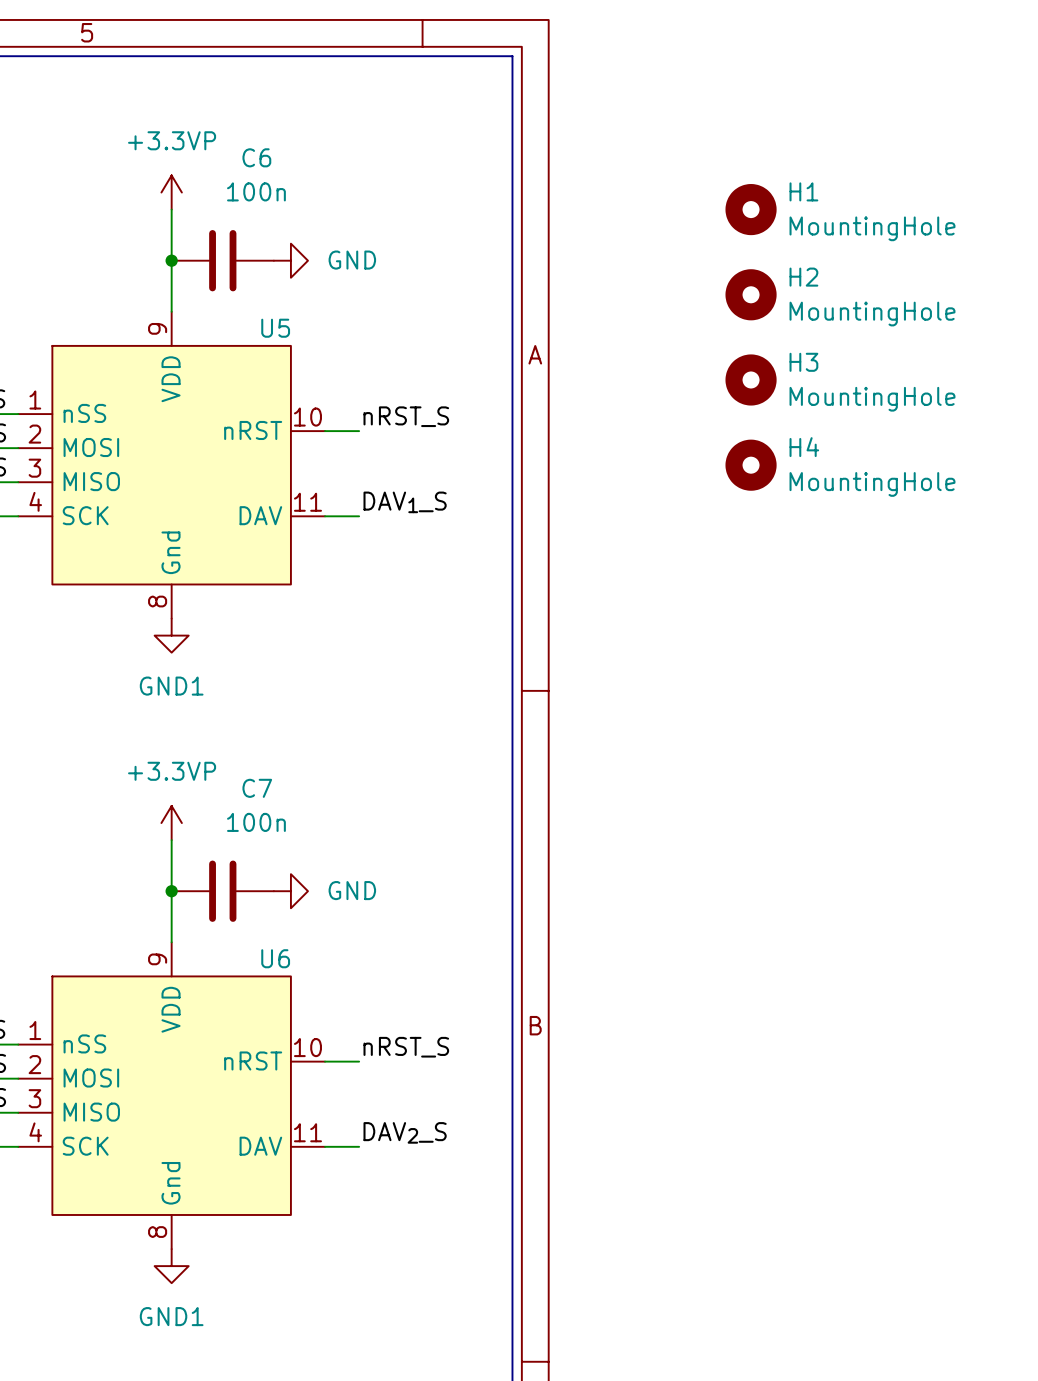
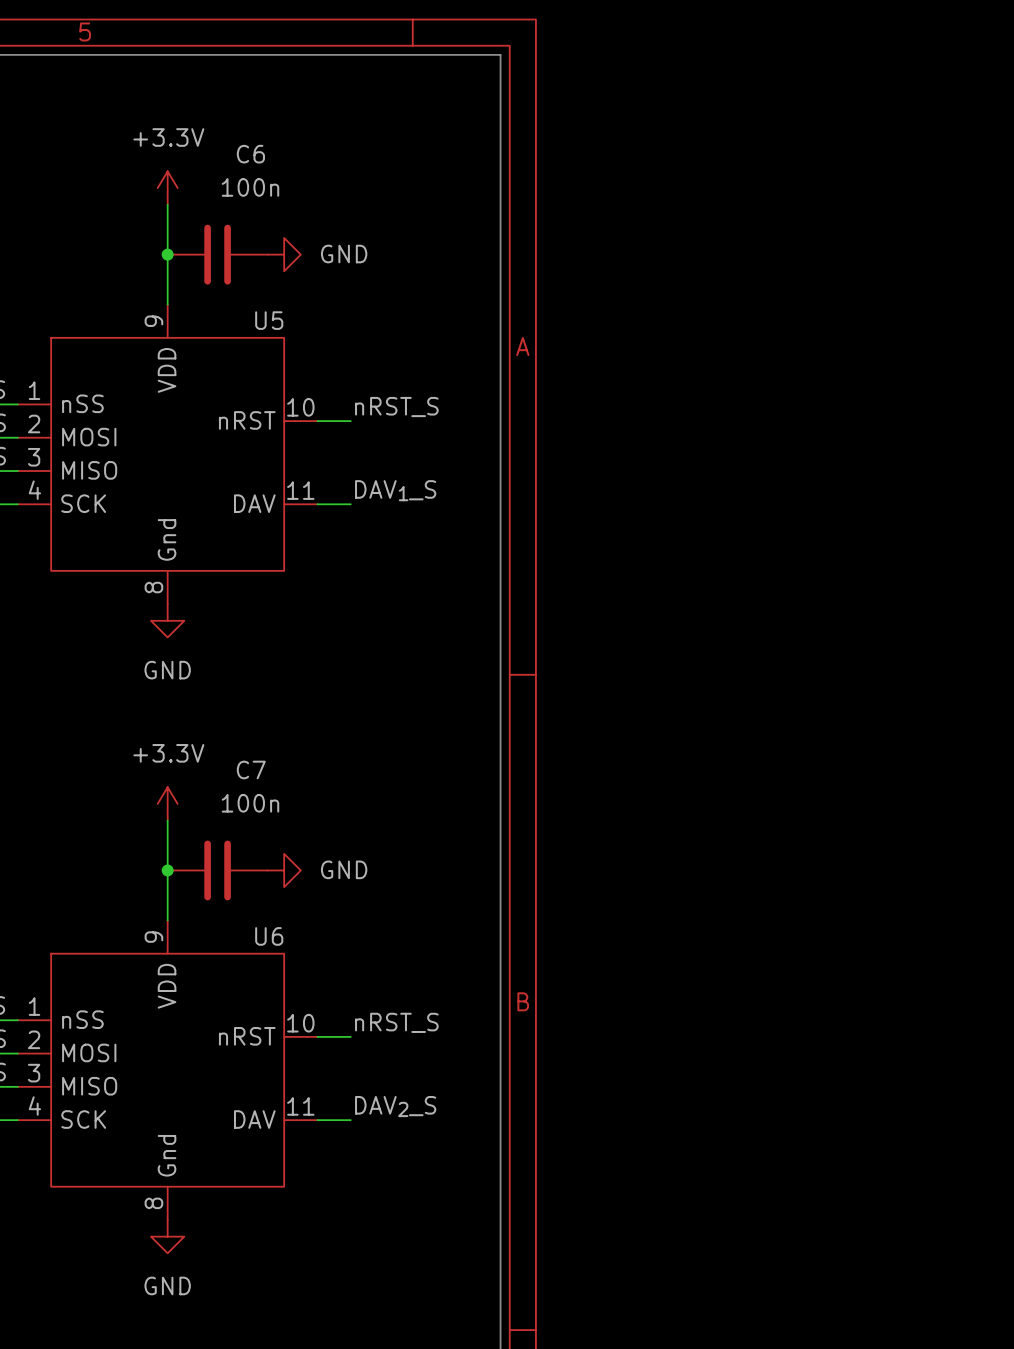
power symbol: +3.3VP (171, 192) -> +3.3V (167, 188)
H1: MountingHole (751, 209) -> none
H2: MountingHole (751, 294) -> none
H3: MountingHole (751, 379) -> none
H4: MountingHole (751, 465) -> none
power symbol: GND1 (171, 635) -> GND (167, 620)
power symbol: +3.3VP (171, 823) -> +3.3V (167, 803)
power symbol: GND1 (171, 1266) -> GND (167, 1236)

